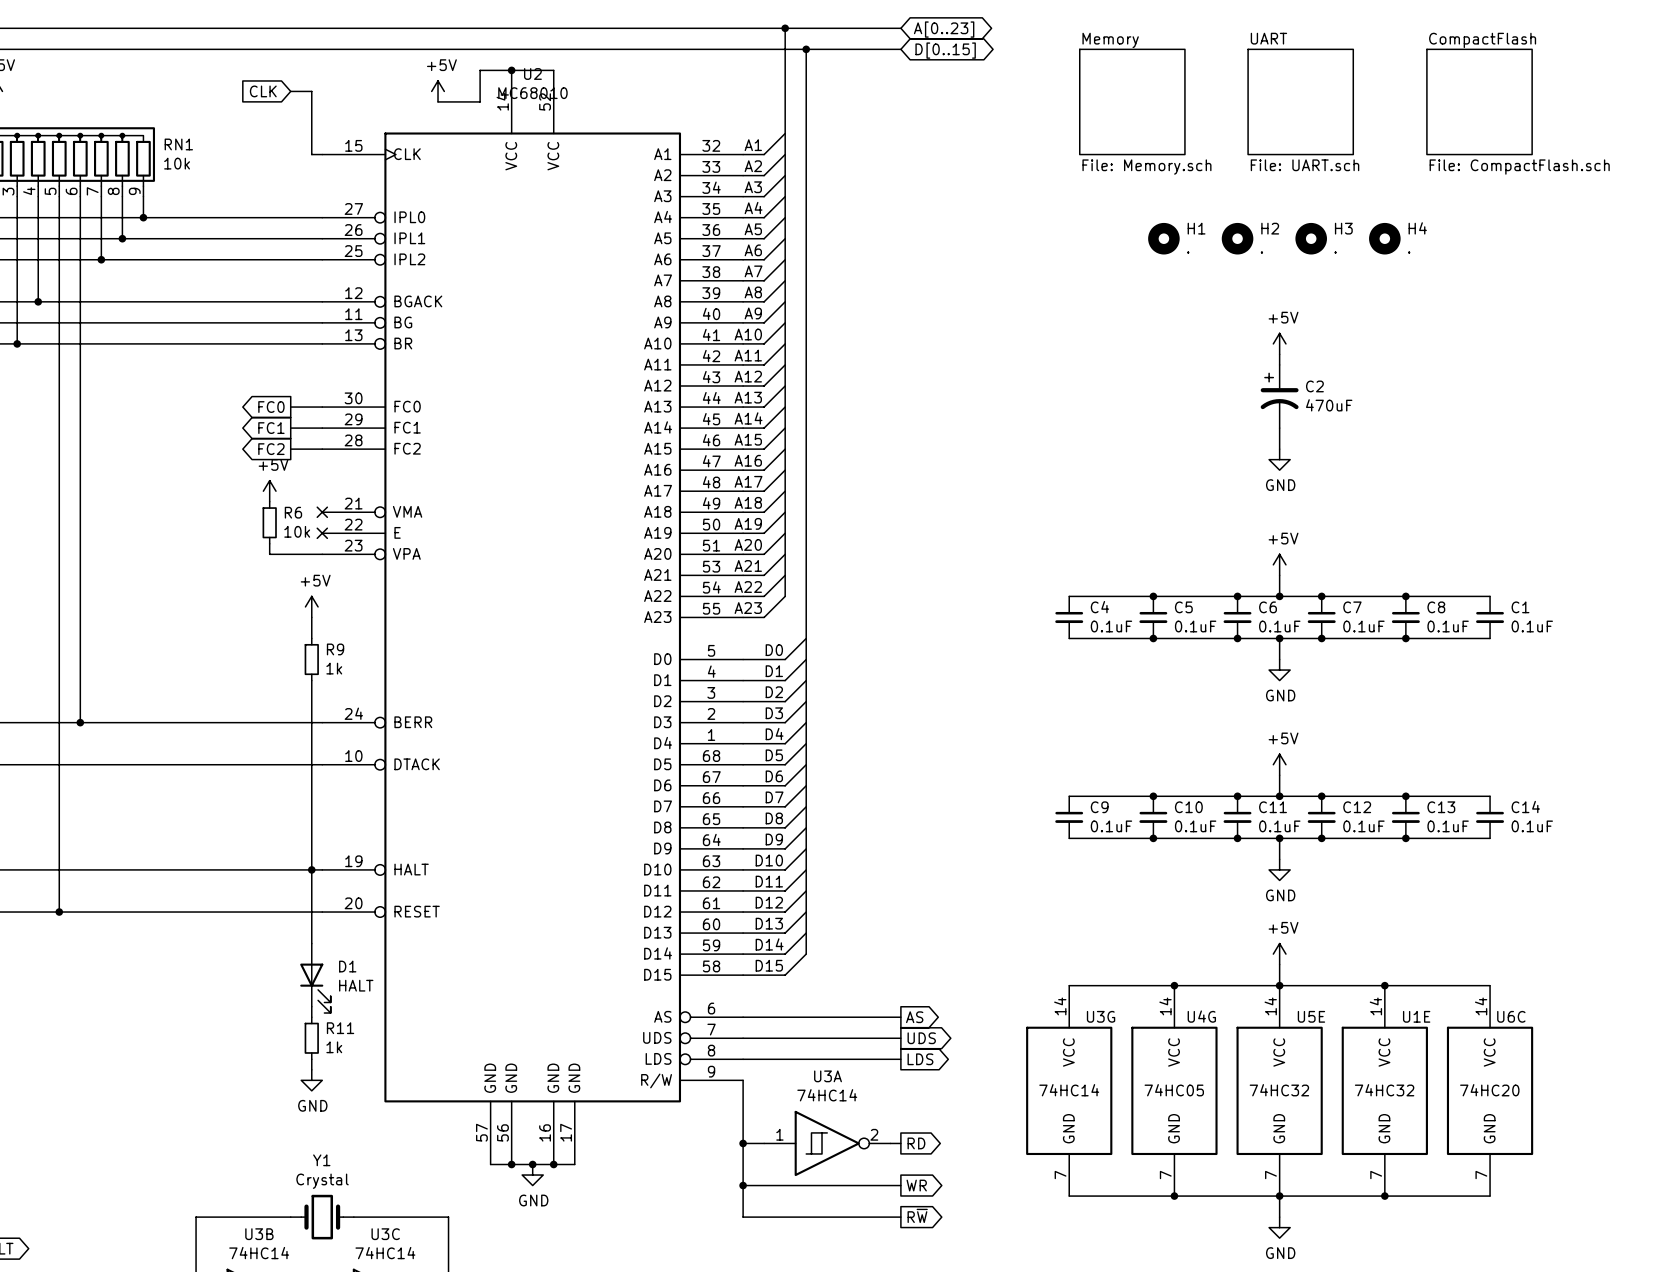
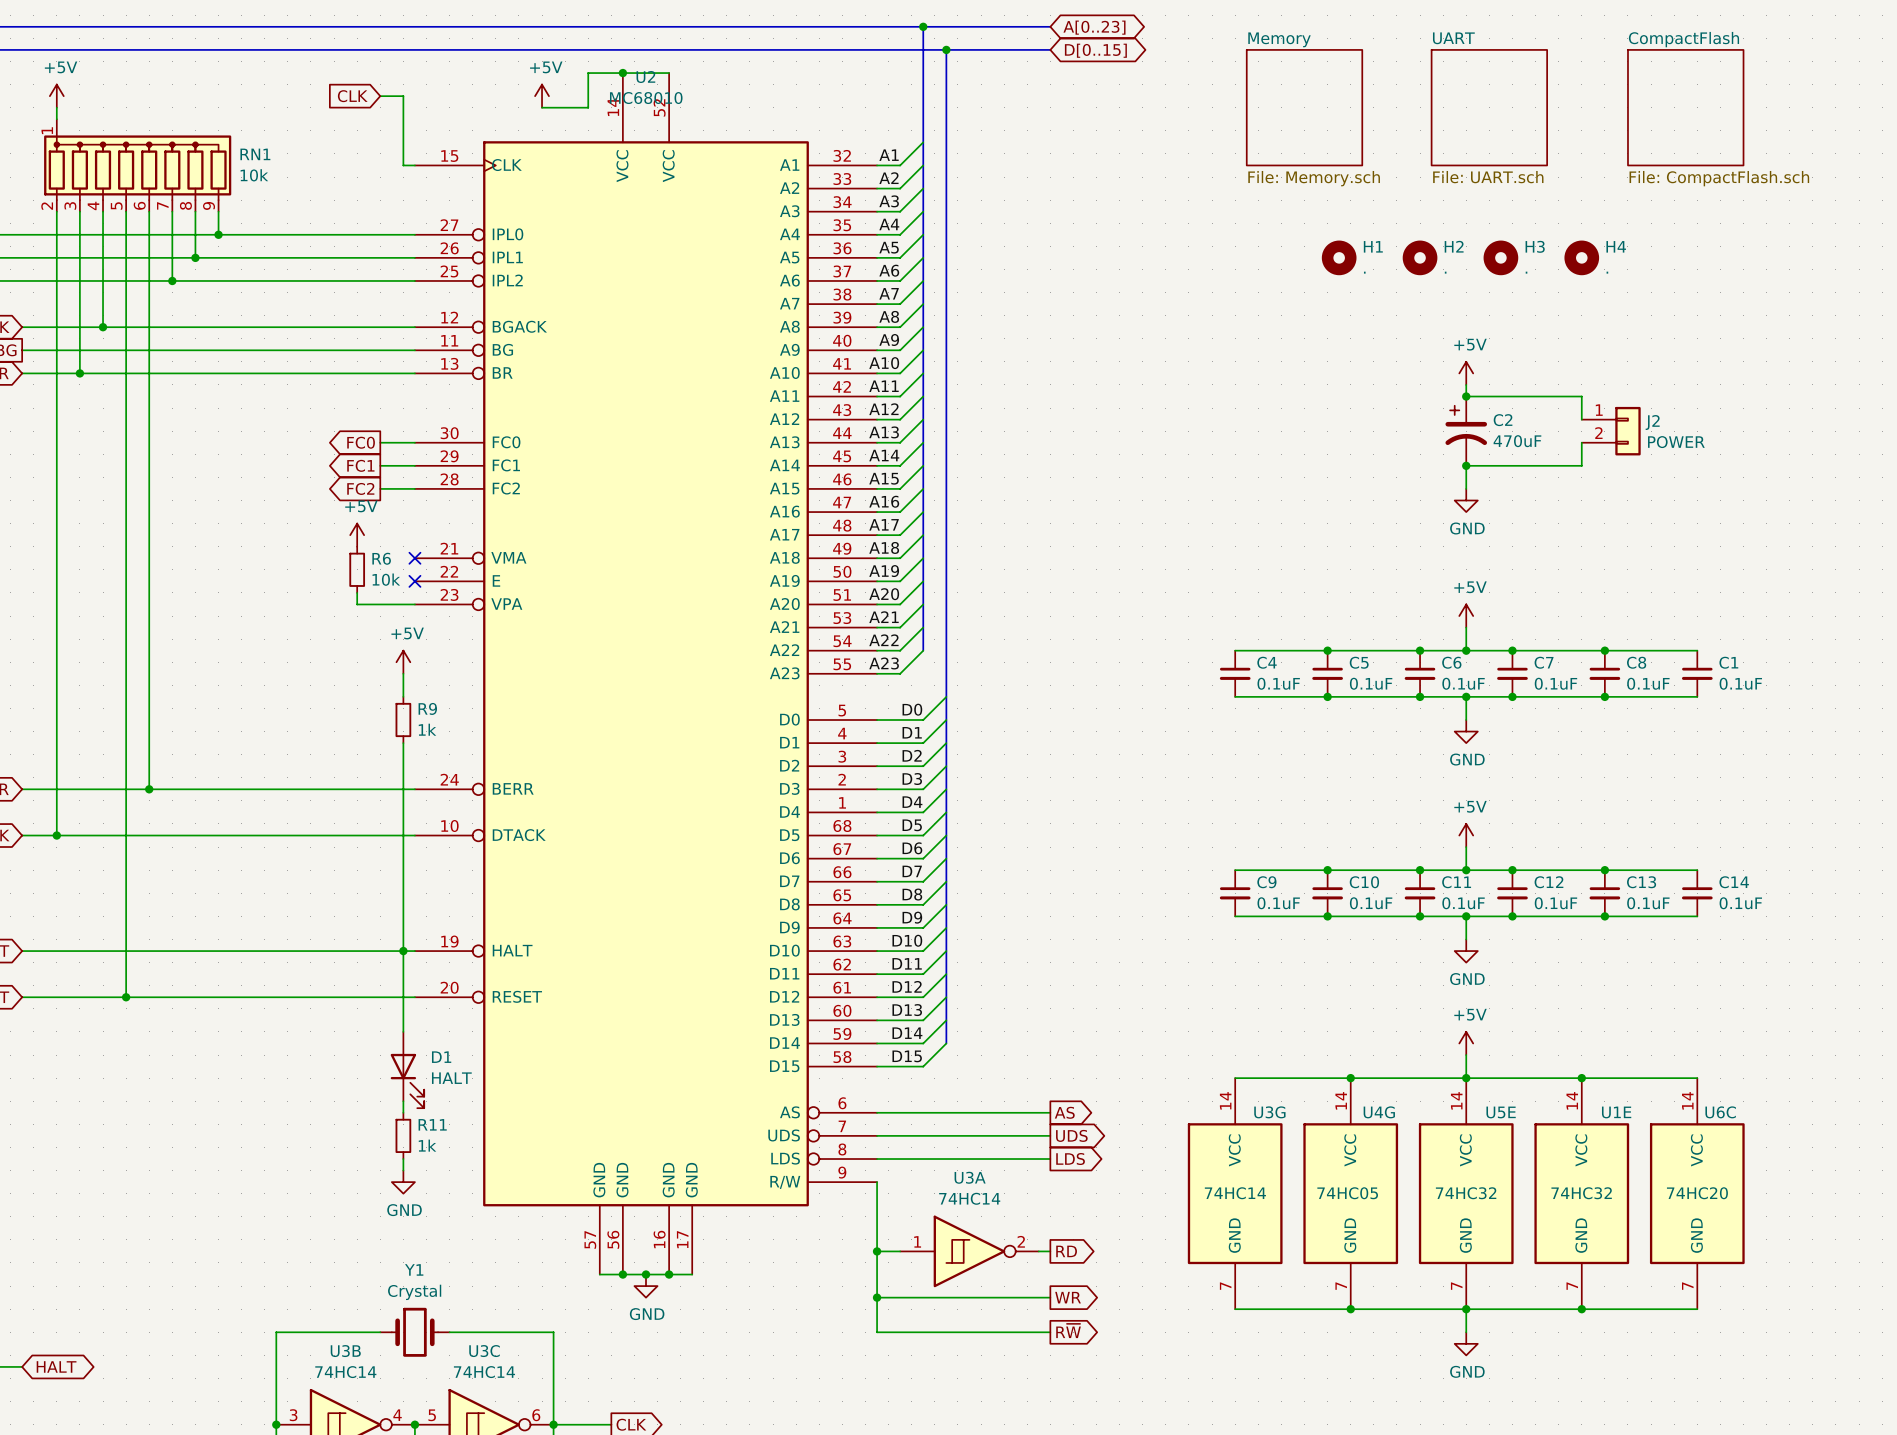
wire: none -> (1466, 396) (1581, 396) (1581, 419)
junction: none -> (1466, 396)
J2: none -> POWER (1611, 431)
wire: none -> (1581, 442) (1581, 465) (1466, 465)
junction: none -> (1466, 465)

